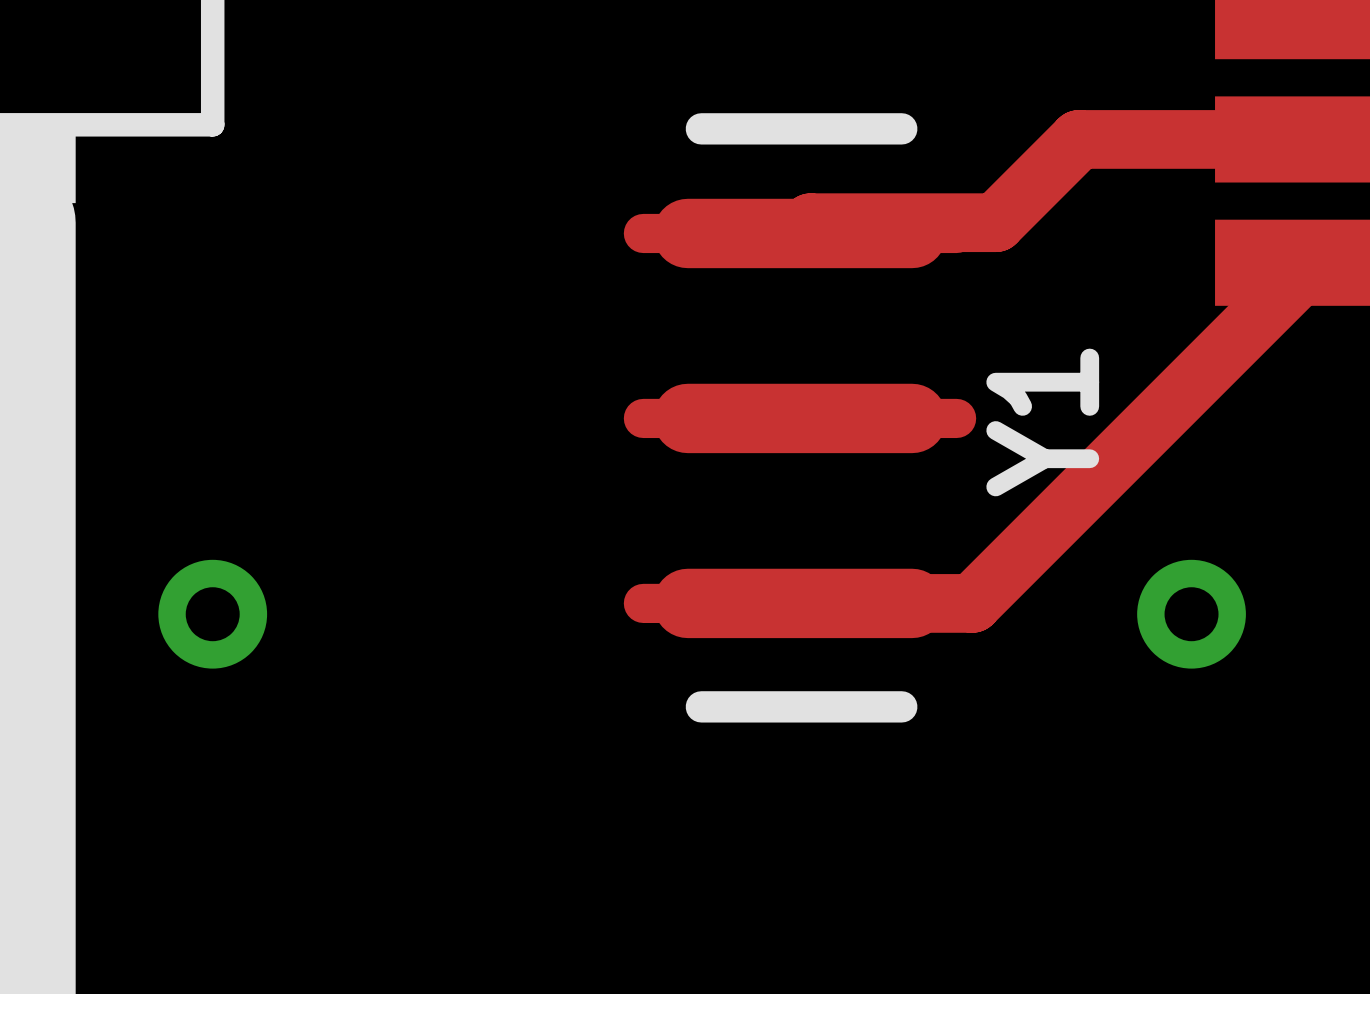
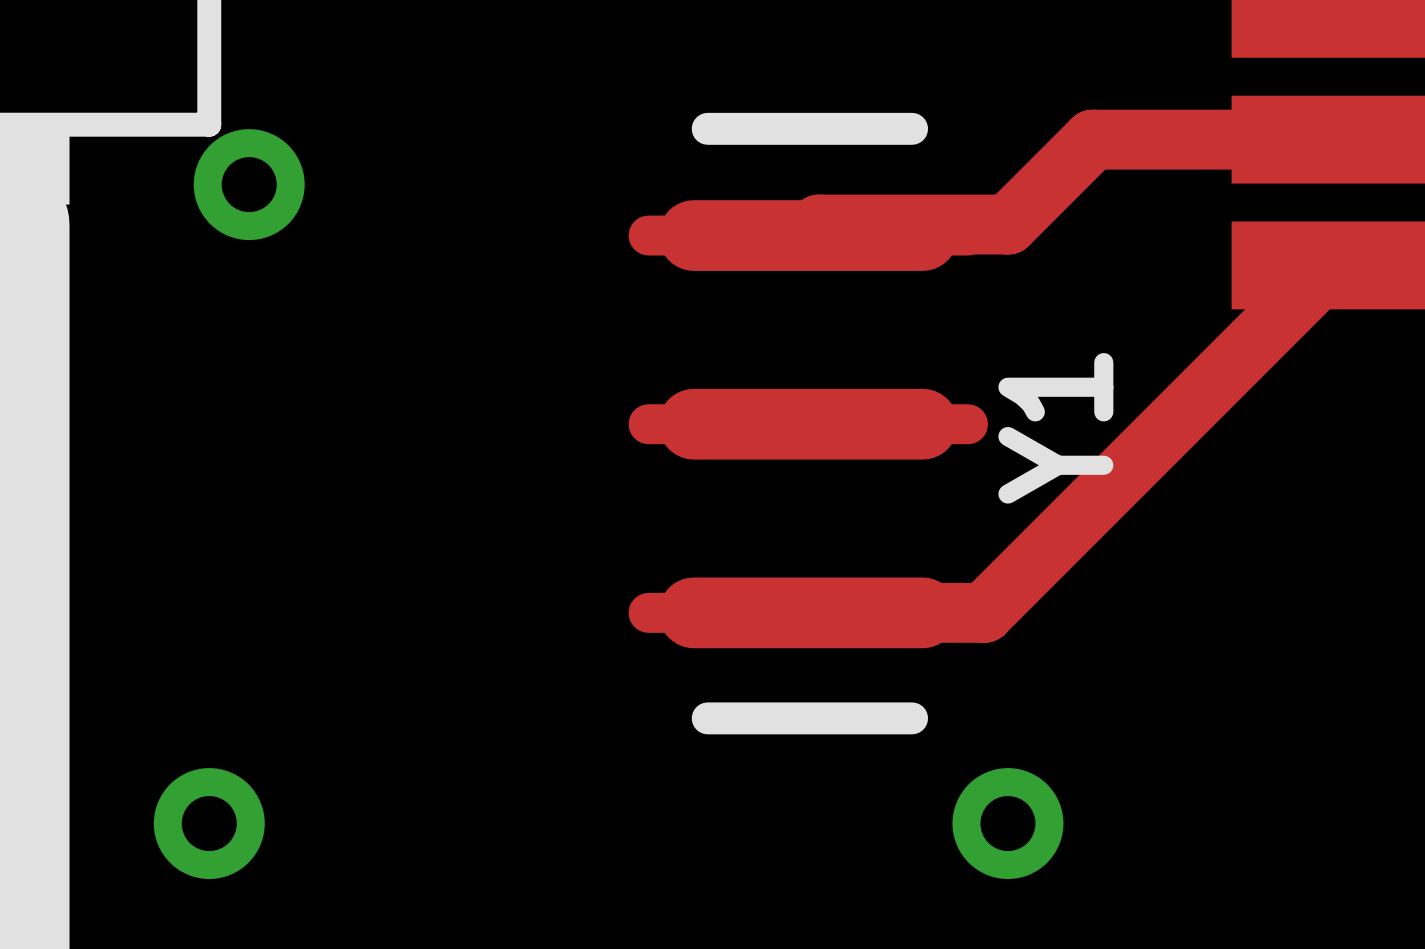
via: none -> (249, 184)
via position: (212, 614) -> (209, 823)
via position: (1191, 614) -> (1007, 823)

